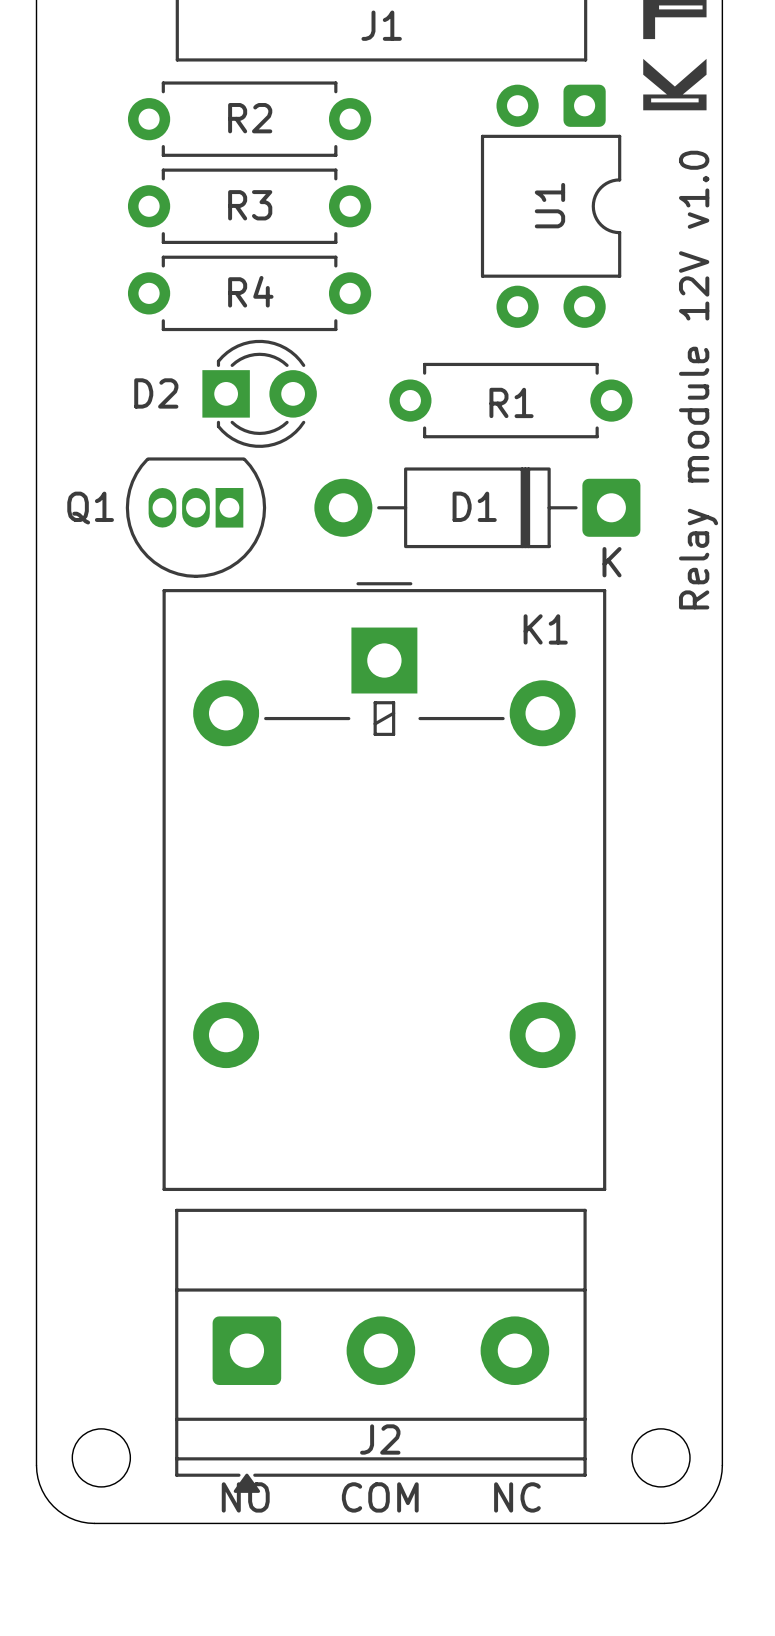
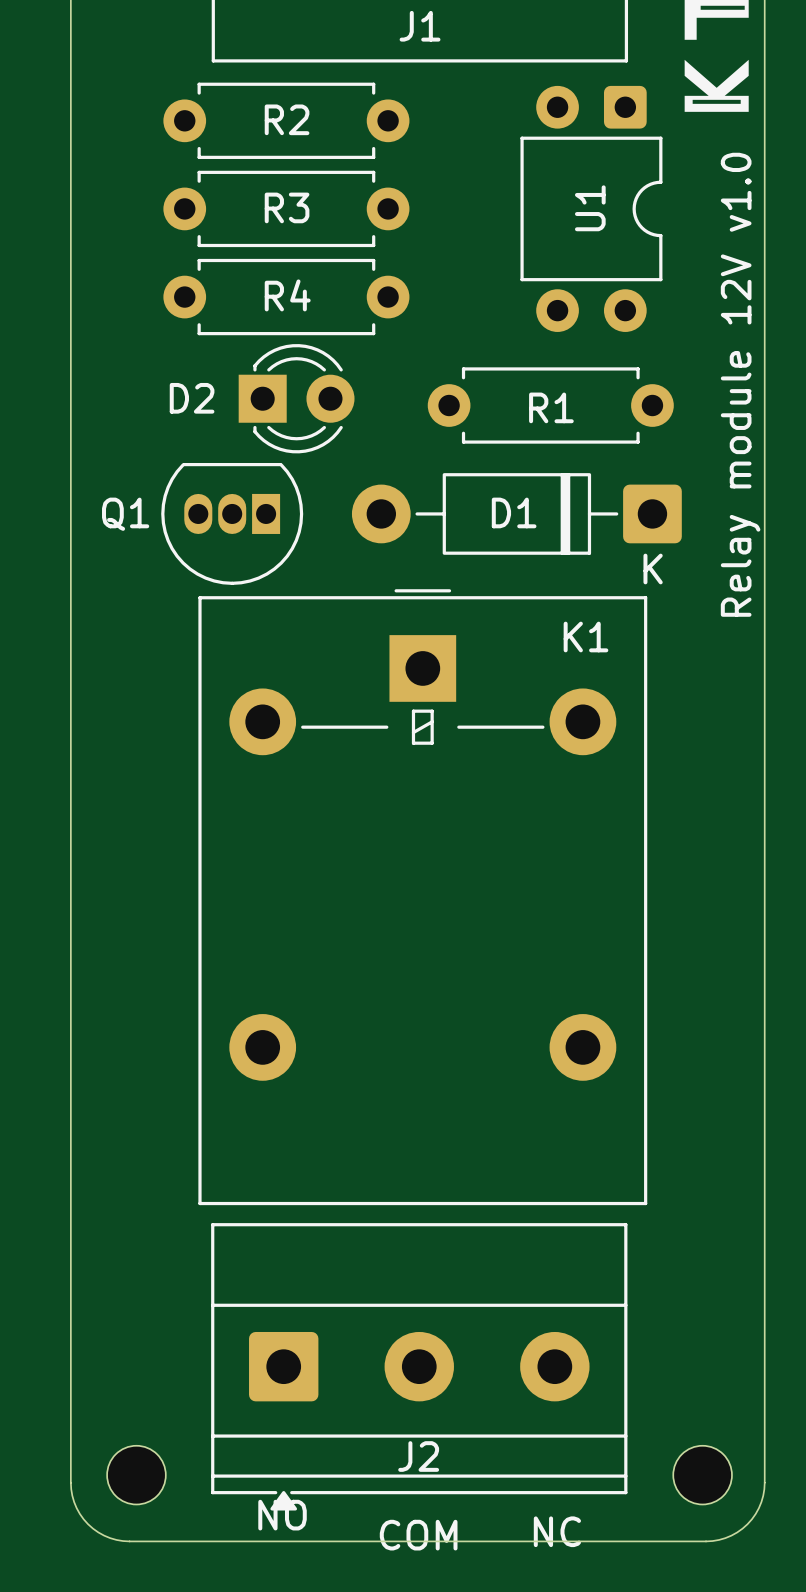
text position: COM (380, 1497) -> COM (418, 1535)
text position: NC (517, 1497) -> NC (557, 1531)

